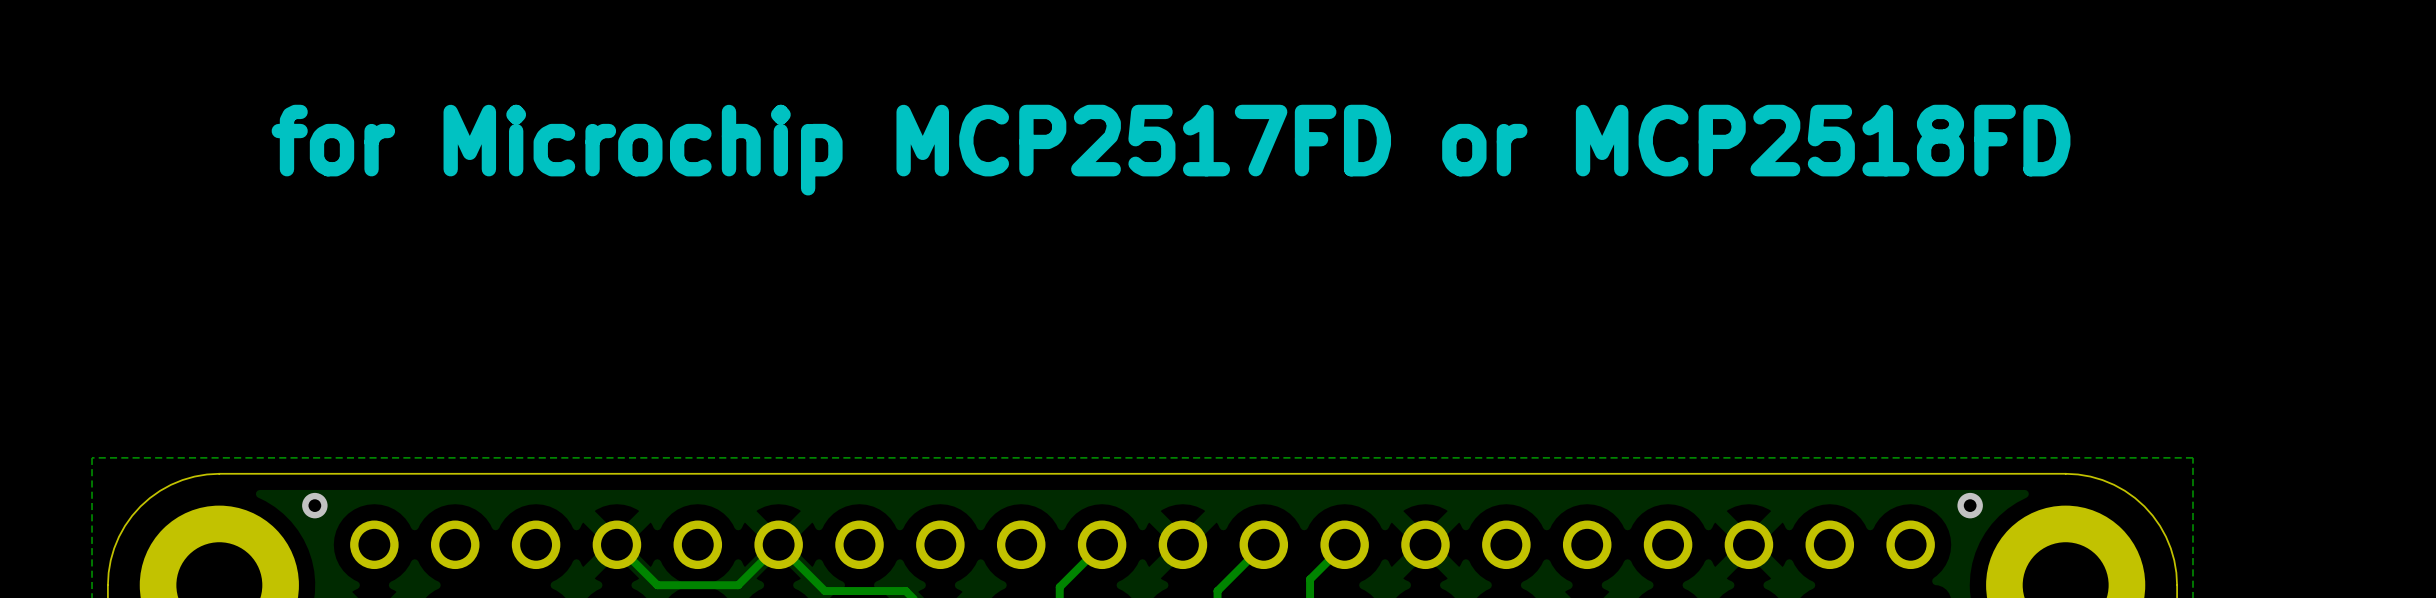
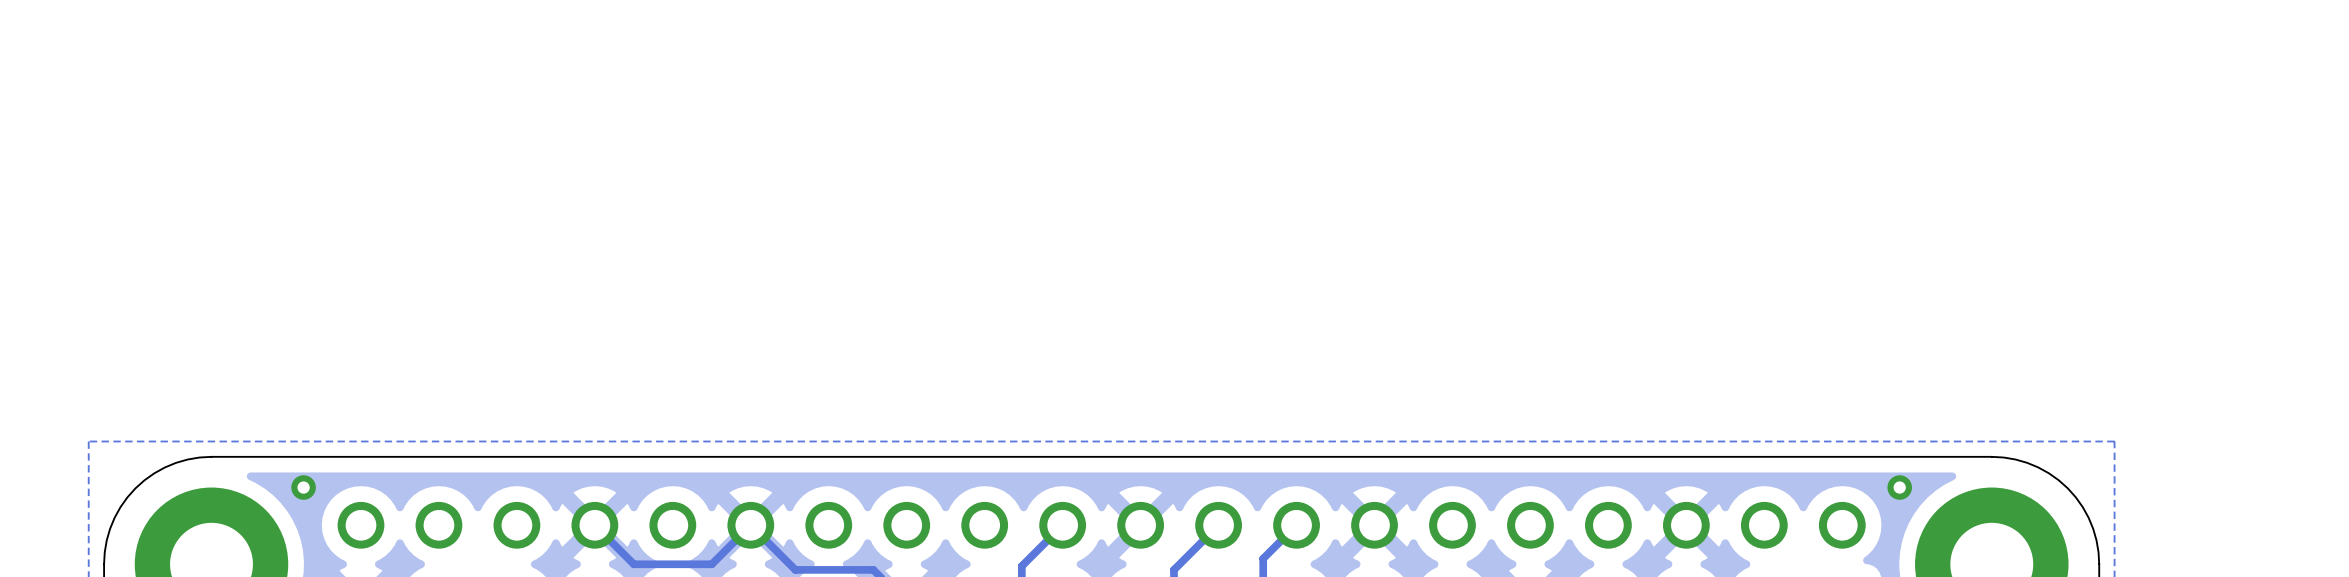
text: for Microchip MCP2517FD or MCP2518FD (1171, 150) -> none

